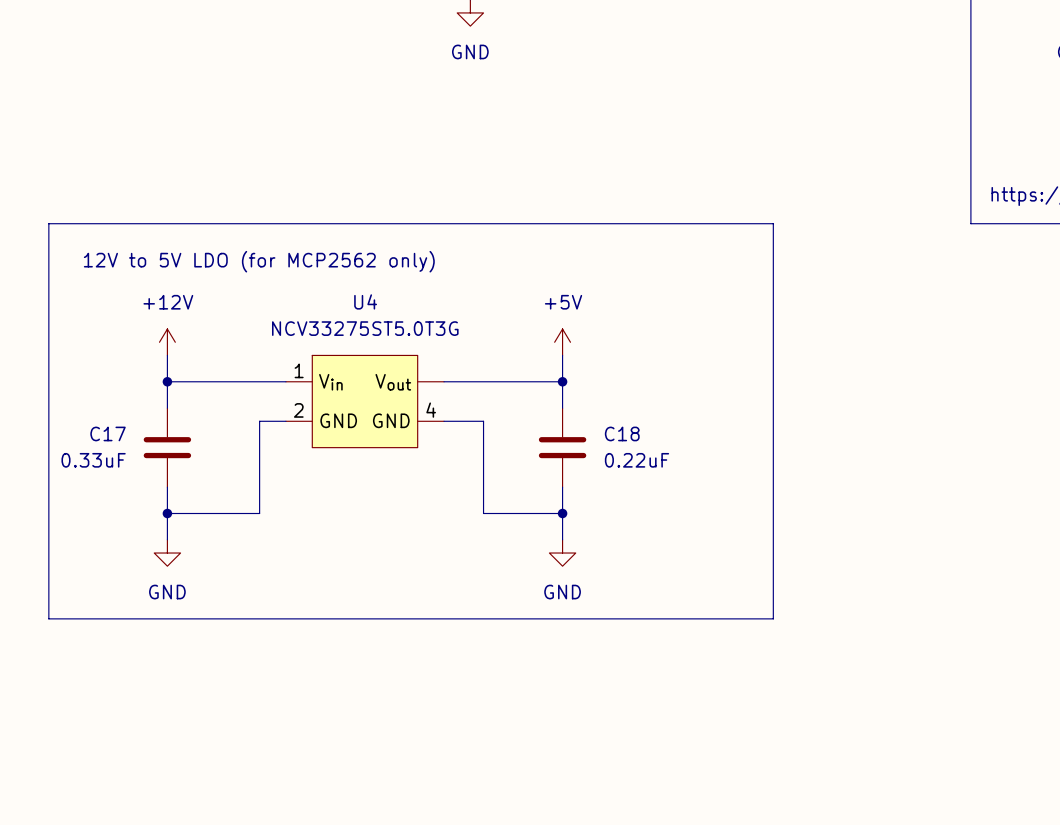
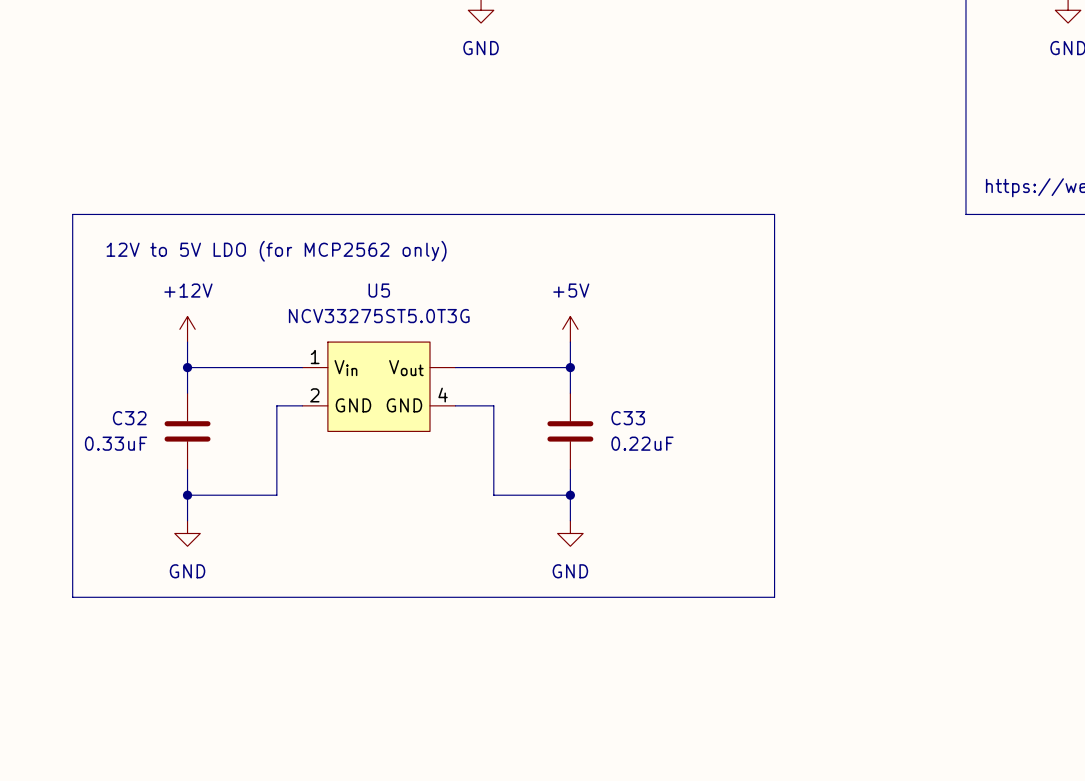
U4 name: U4 (365, 301) -> U5 (379, 290)
C17 name: C17 (108, 433) -> C32 (129, 418)
C18 name: C18 (622, 433) -> C33 (628, 418)

